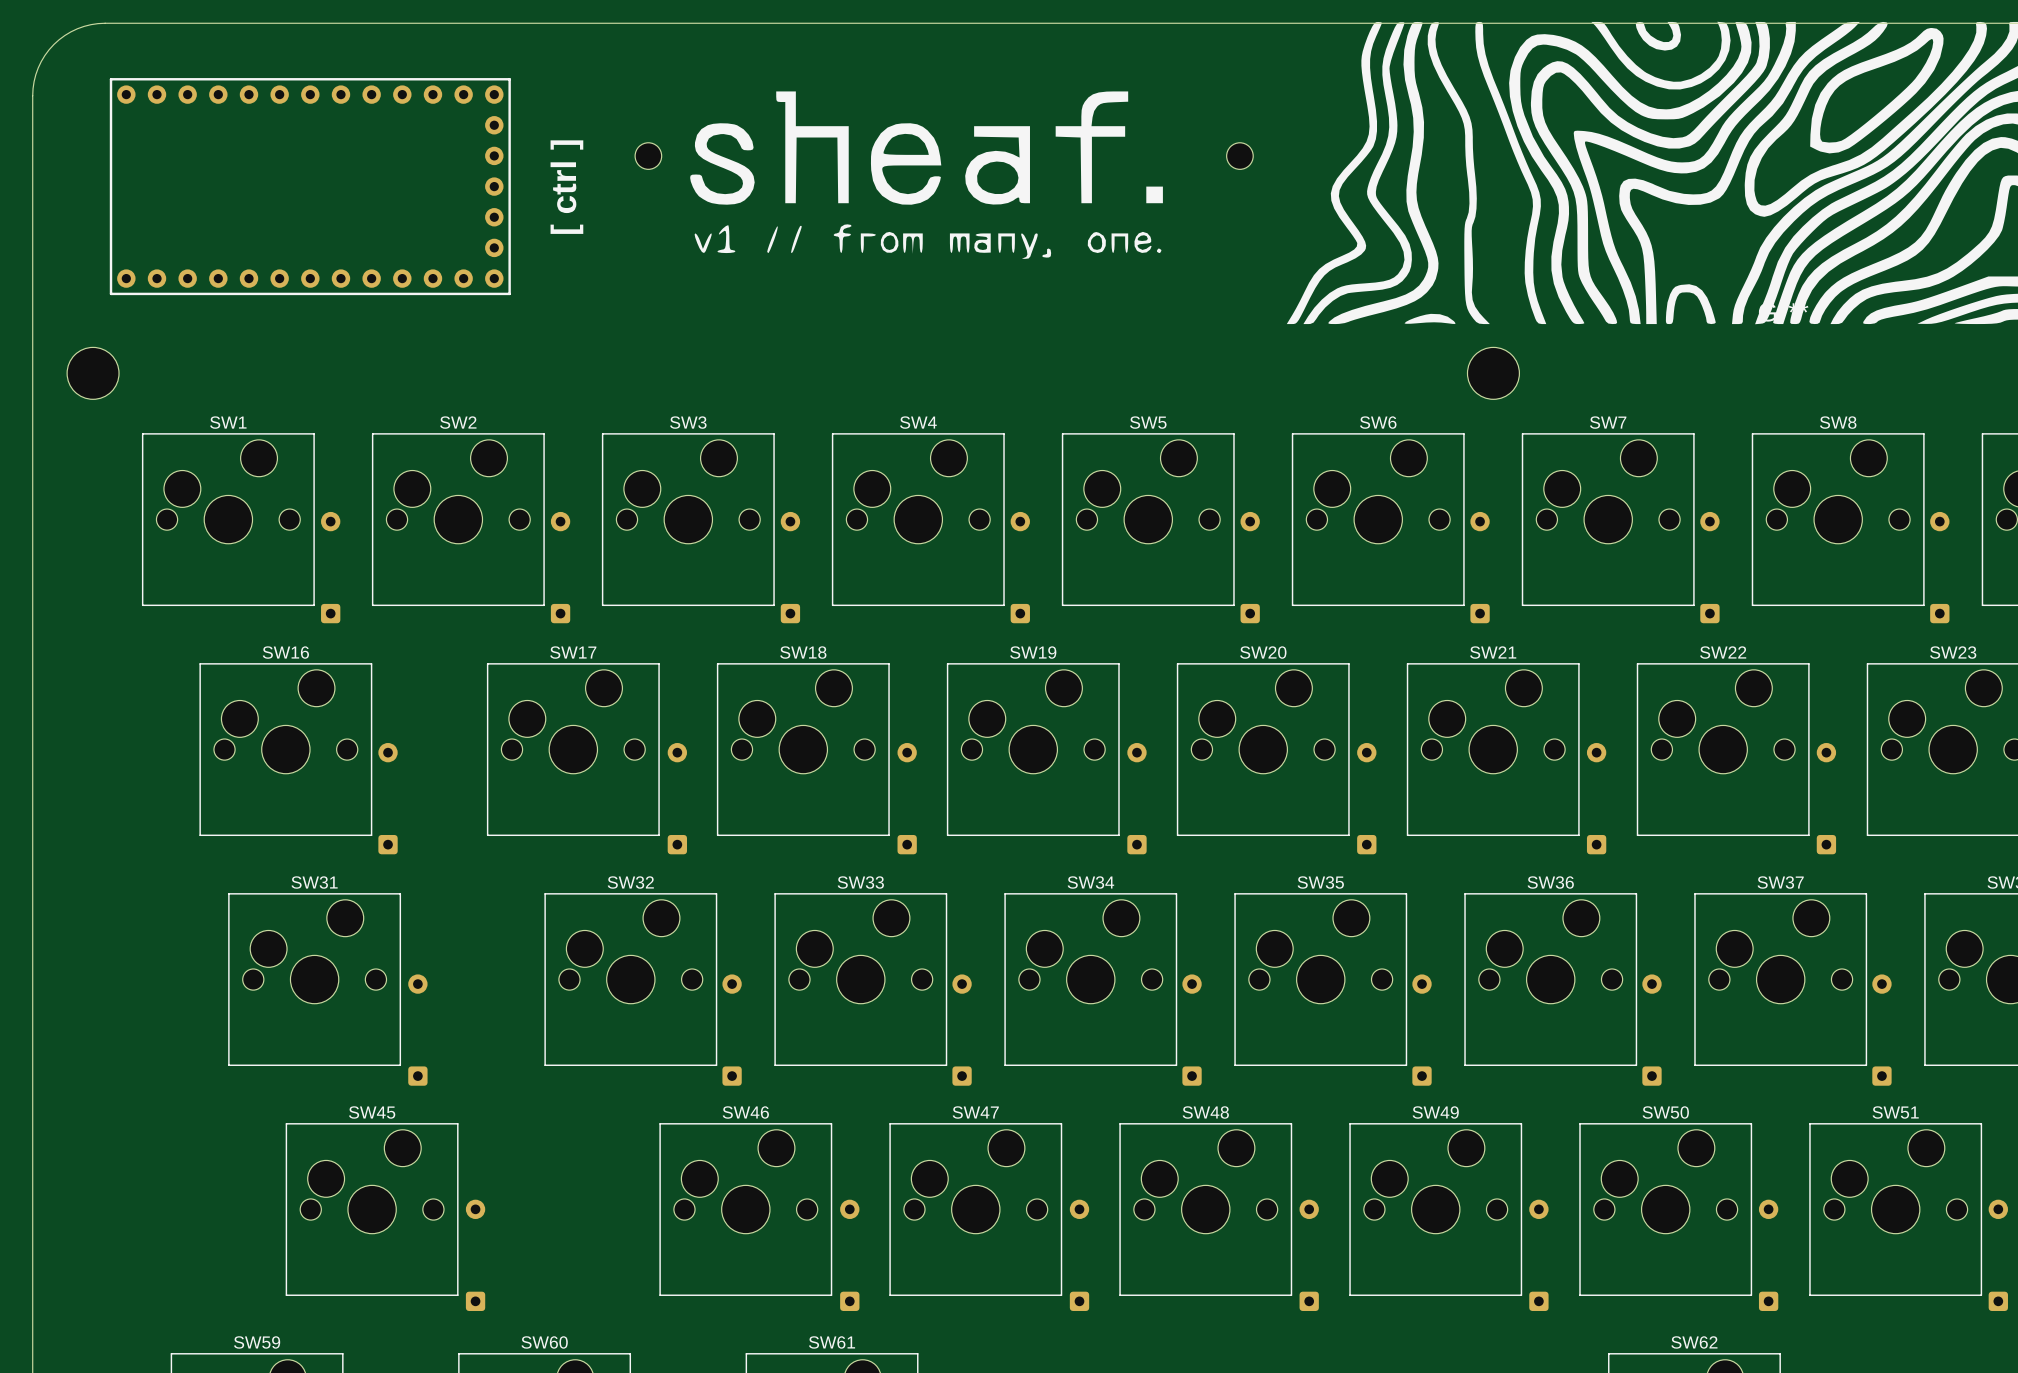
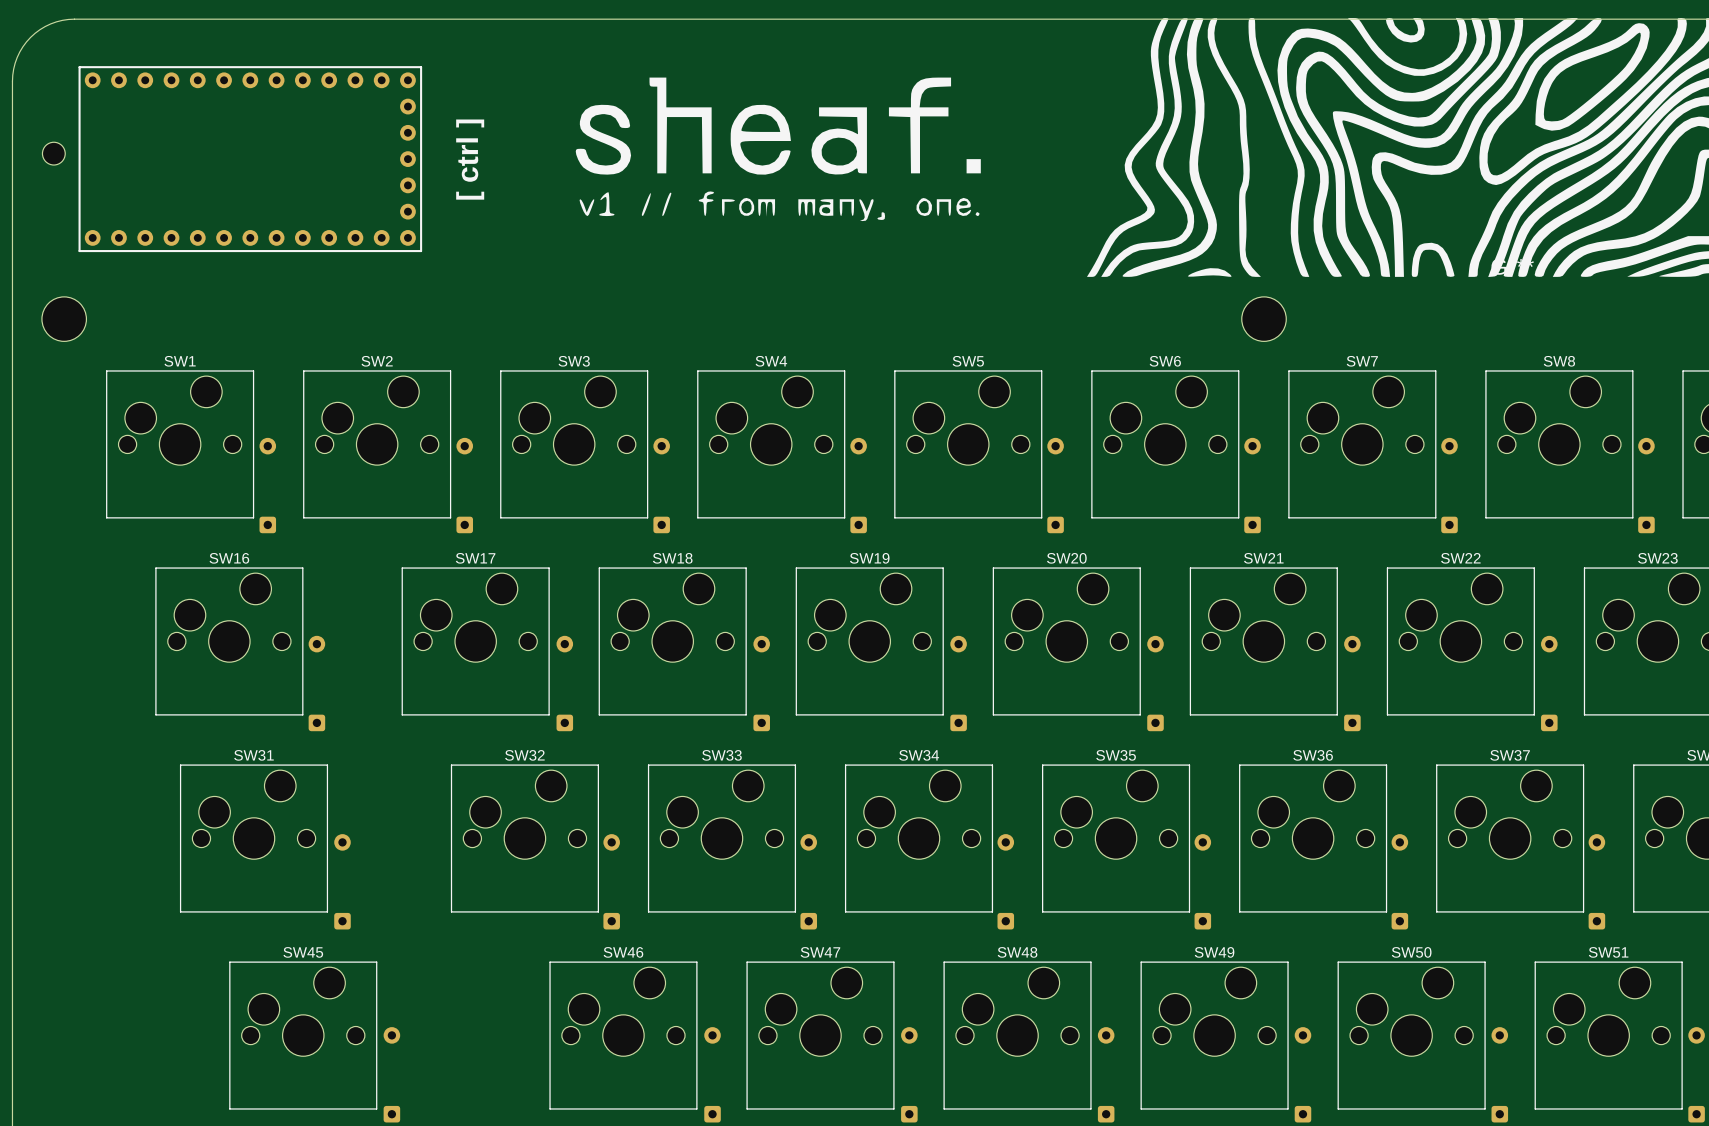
part: (648, 156) -> none
part: (1239, 156) -> none
part: none -> (53, 153)

